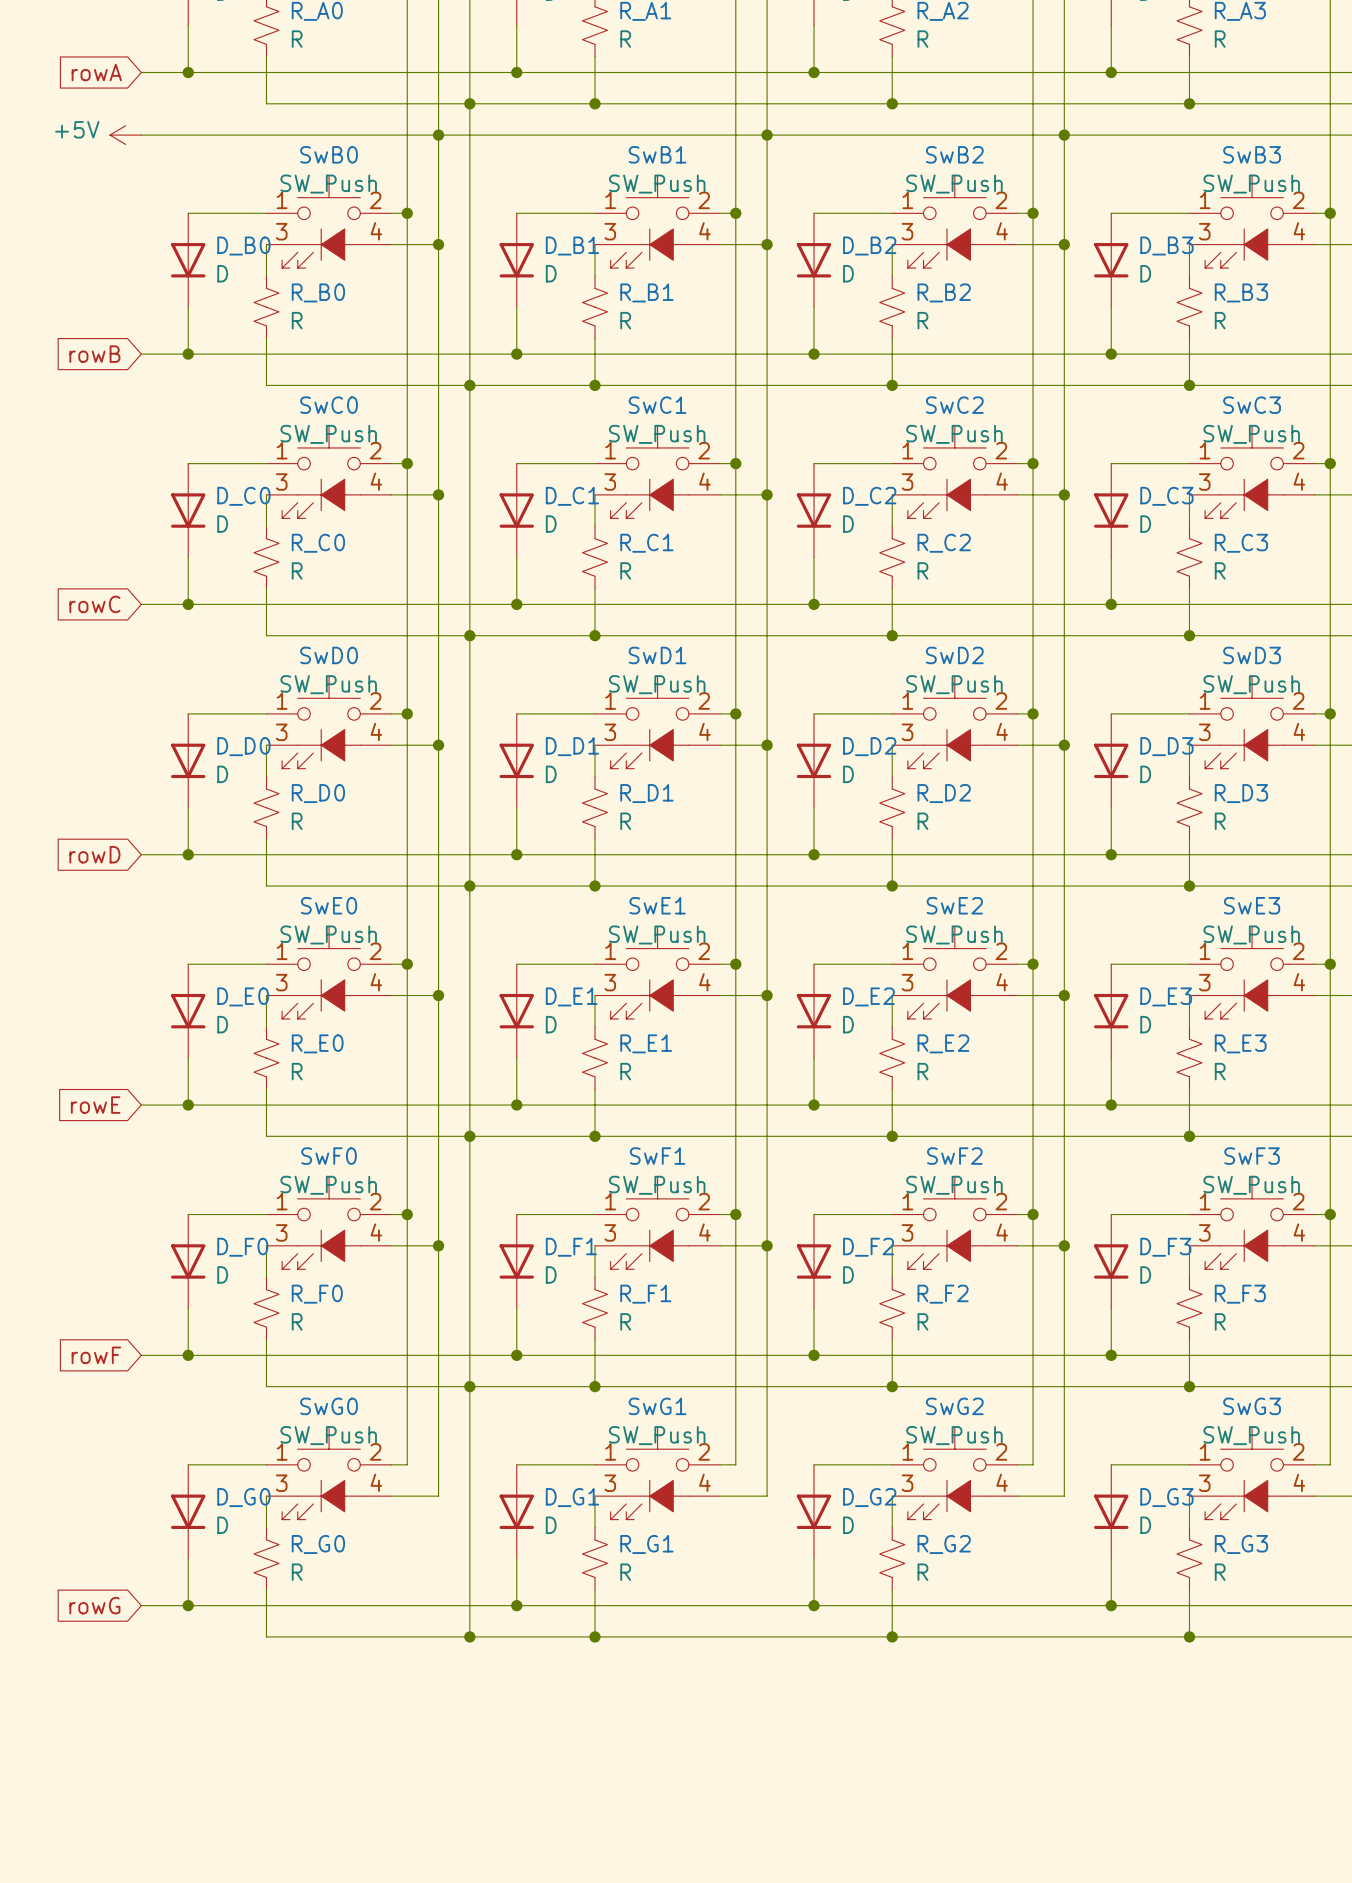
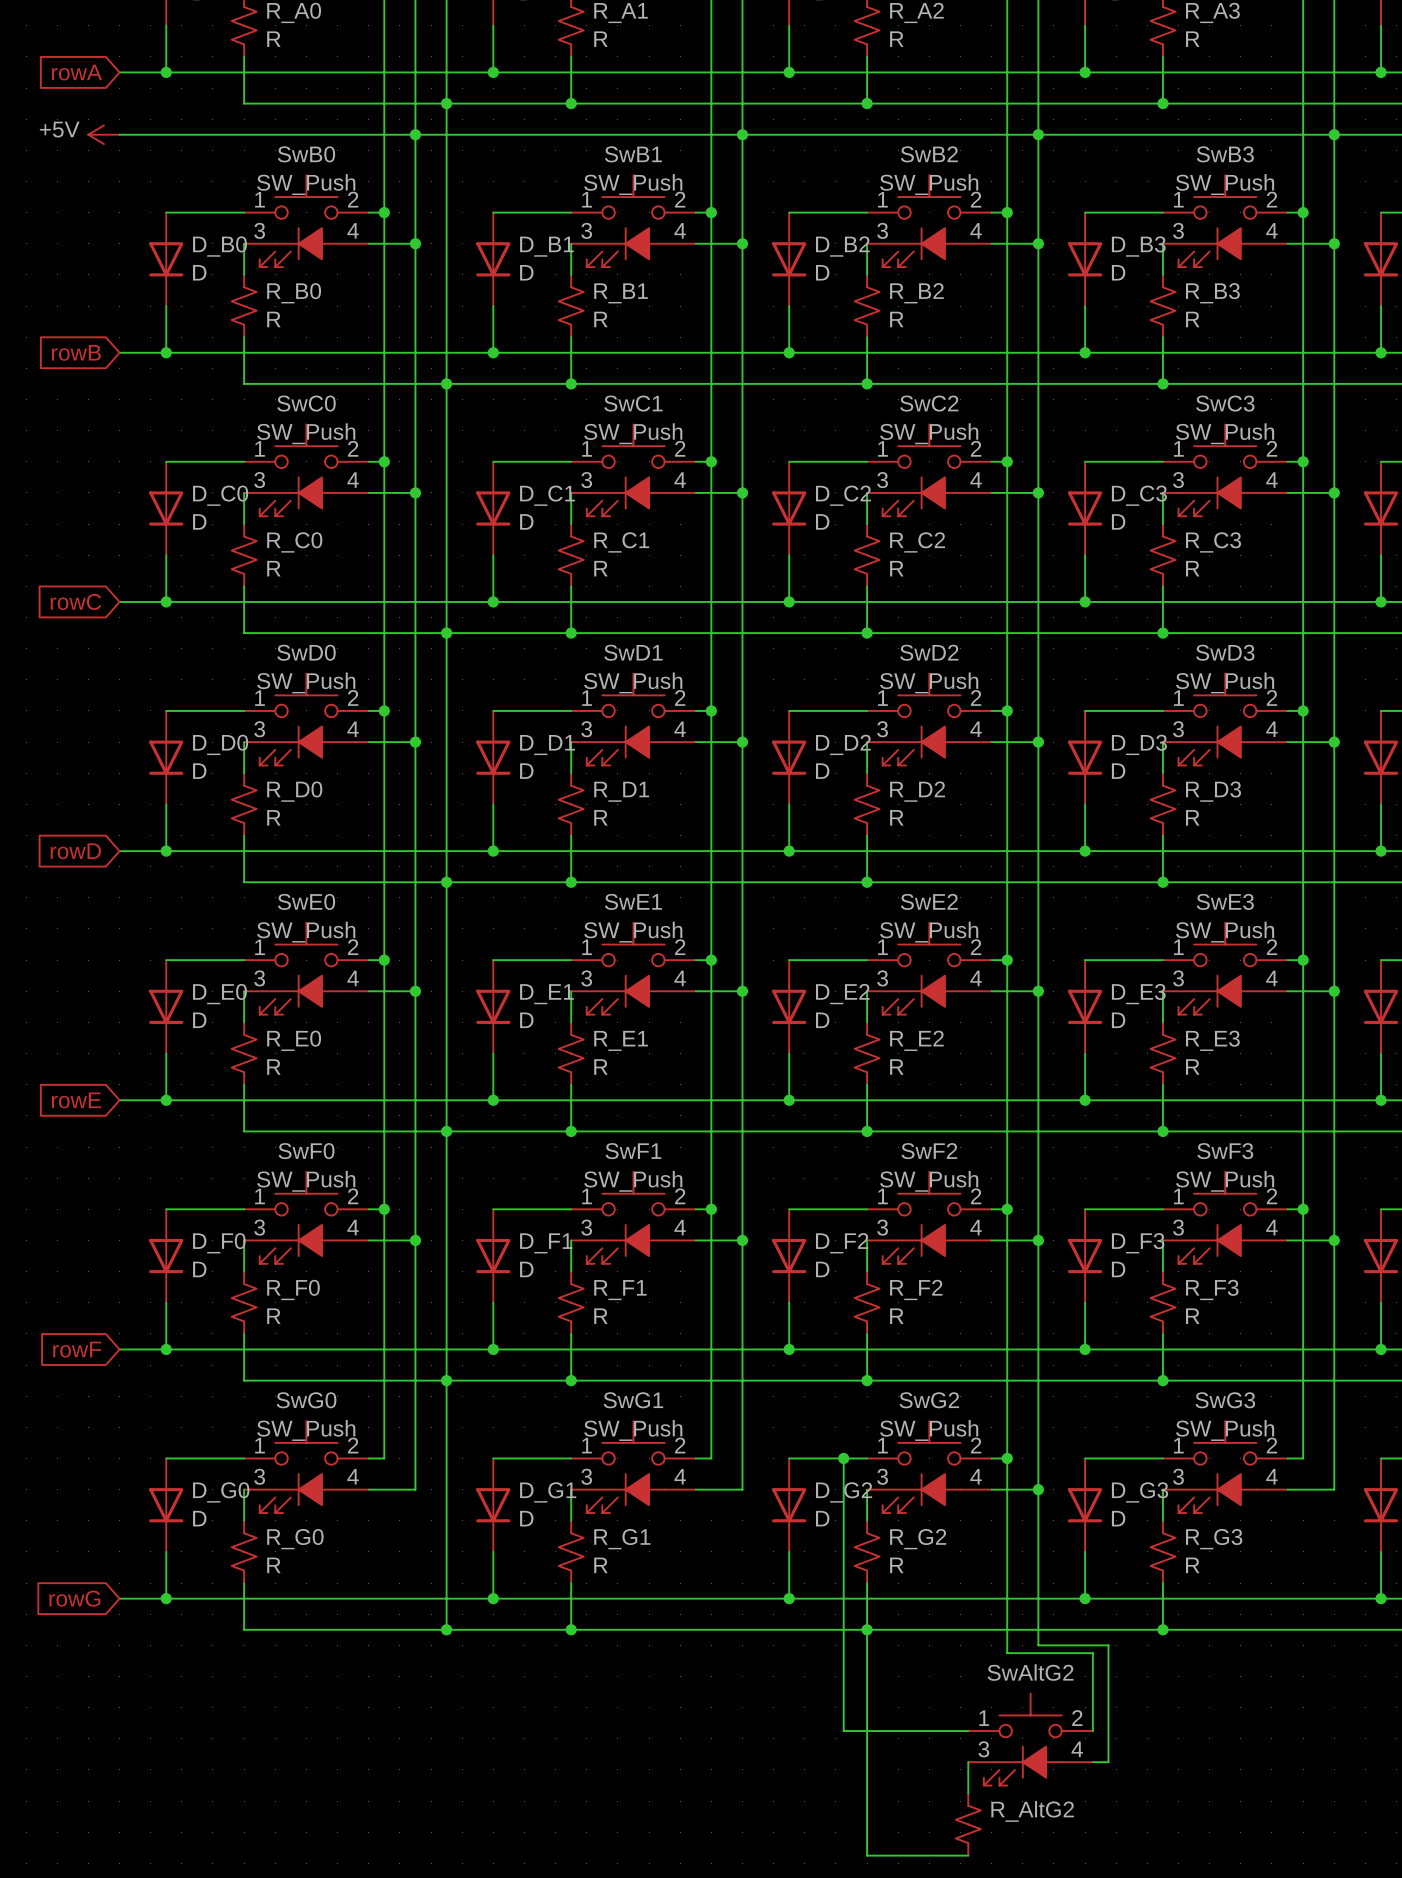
wire: none -> (843, 1458) (843, 1731) (968, 1731)
junction: none -> (843, 1458)
wire: none -> (1007, 1458) (1007, 1653) (1092, 1653) (1092, 1731)
junction: none -> (1007, 1458)
wire: none -> (1038, 1489) (1038, 1645) (1108, 1645) (1108, 1762) (1092, 1762)
junction: none -> (1038, 1489)
wire: none -> (867, 1629) (867, 1855) (968, 1855)
SwAltG2: none -> (1030, 1739)
wire: none -> (968, 1762) (968, 1793)
R_AltG2: none -> (968, 1824)

